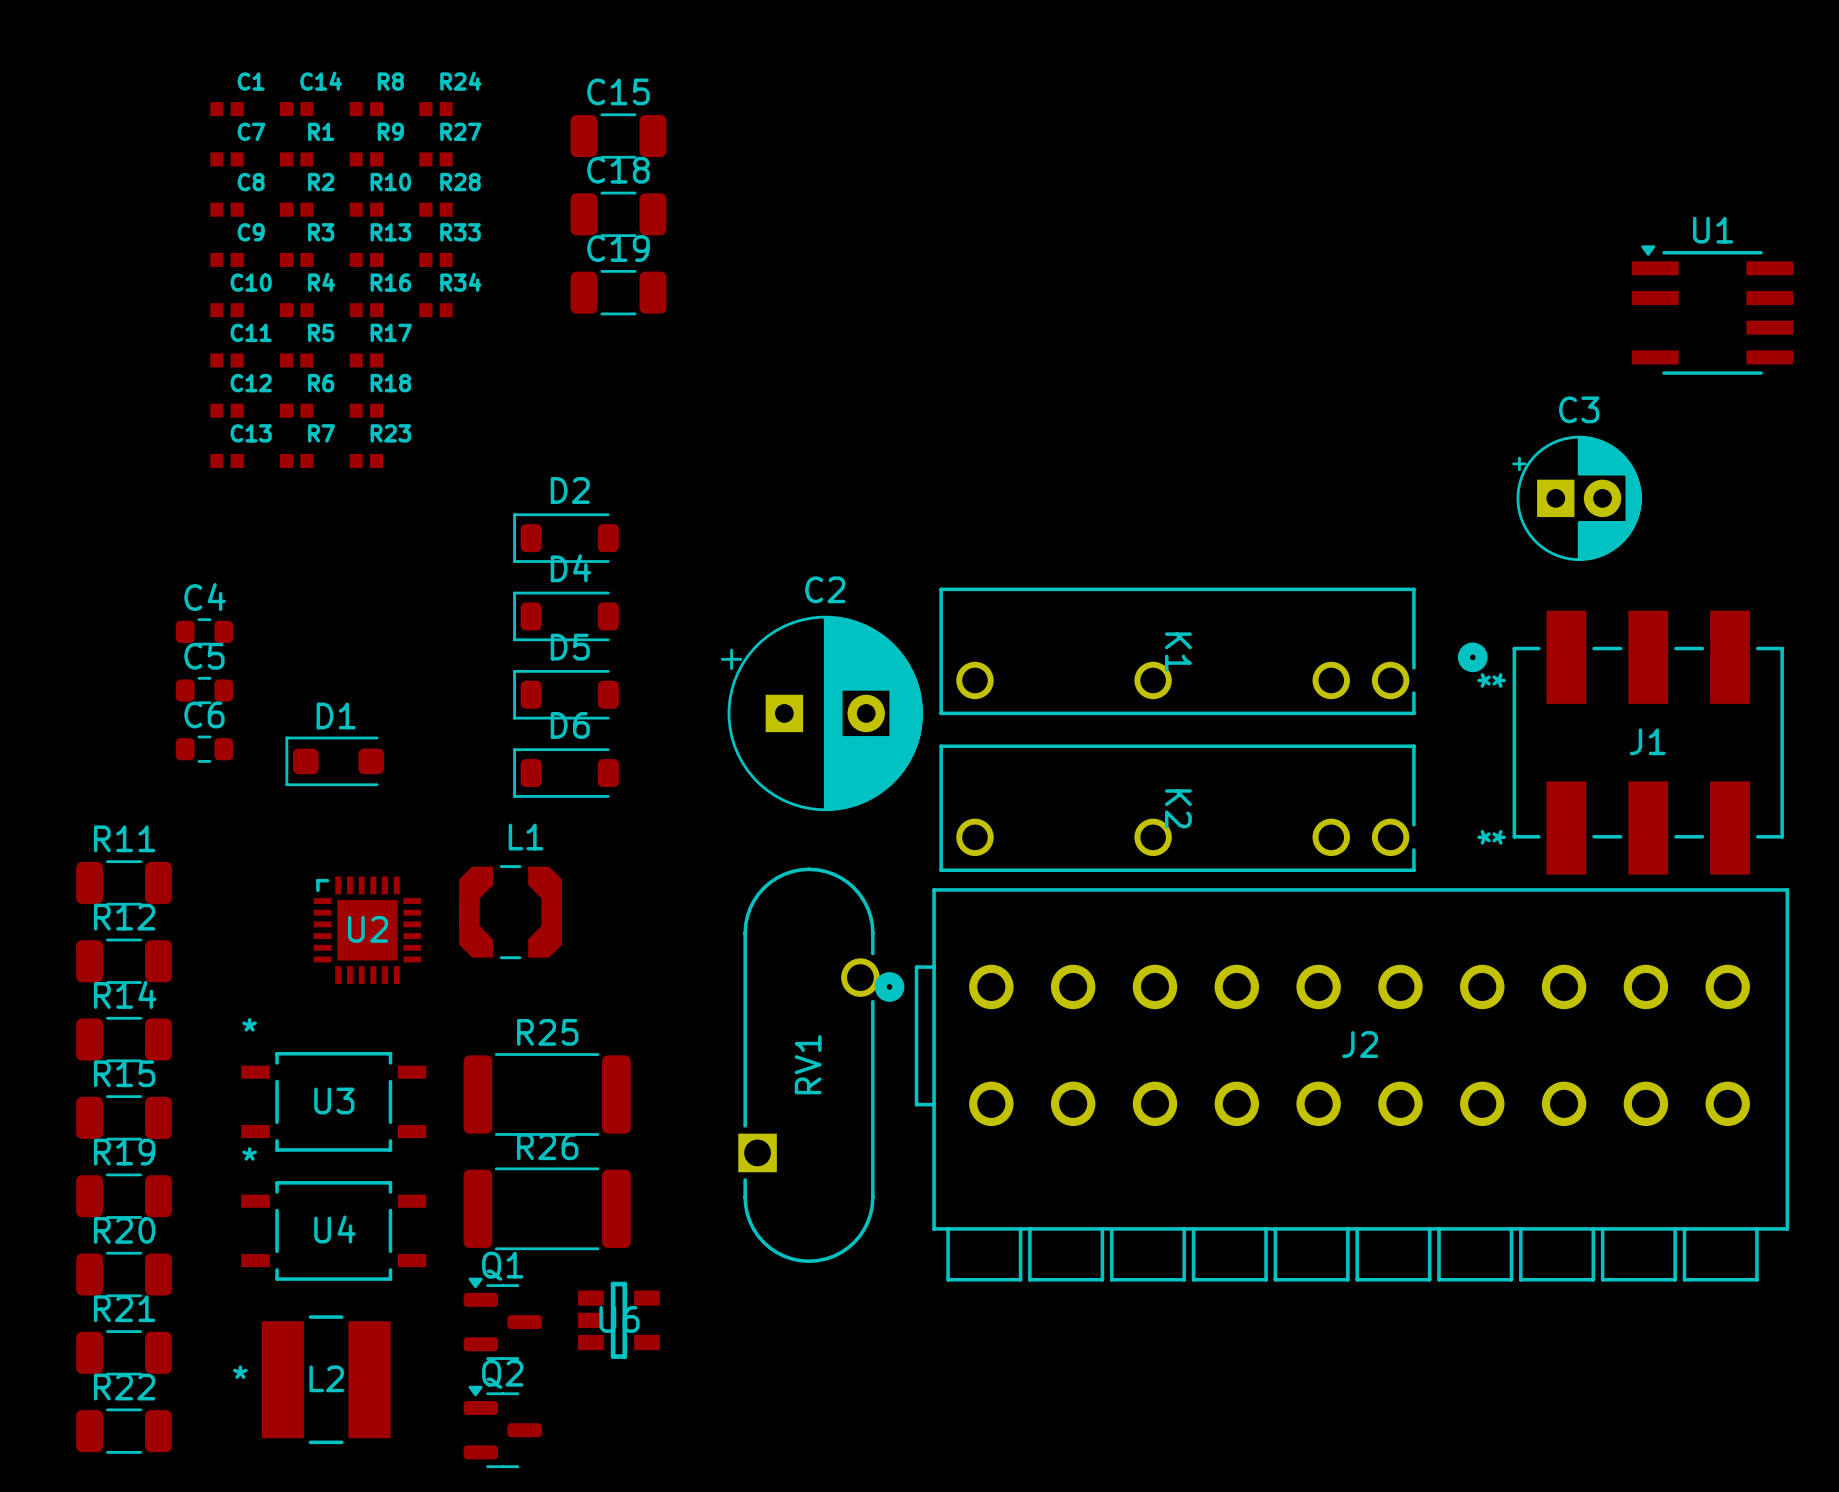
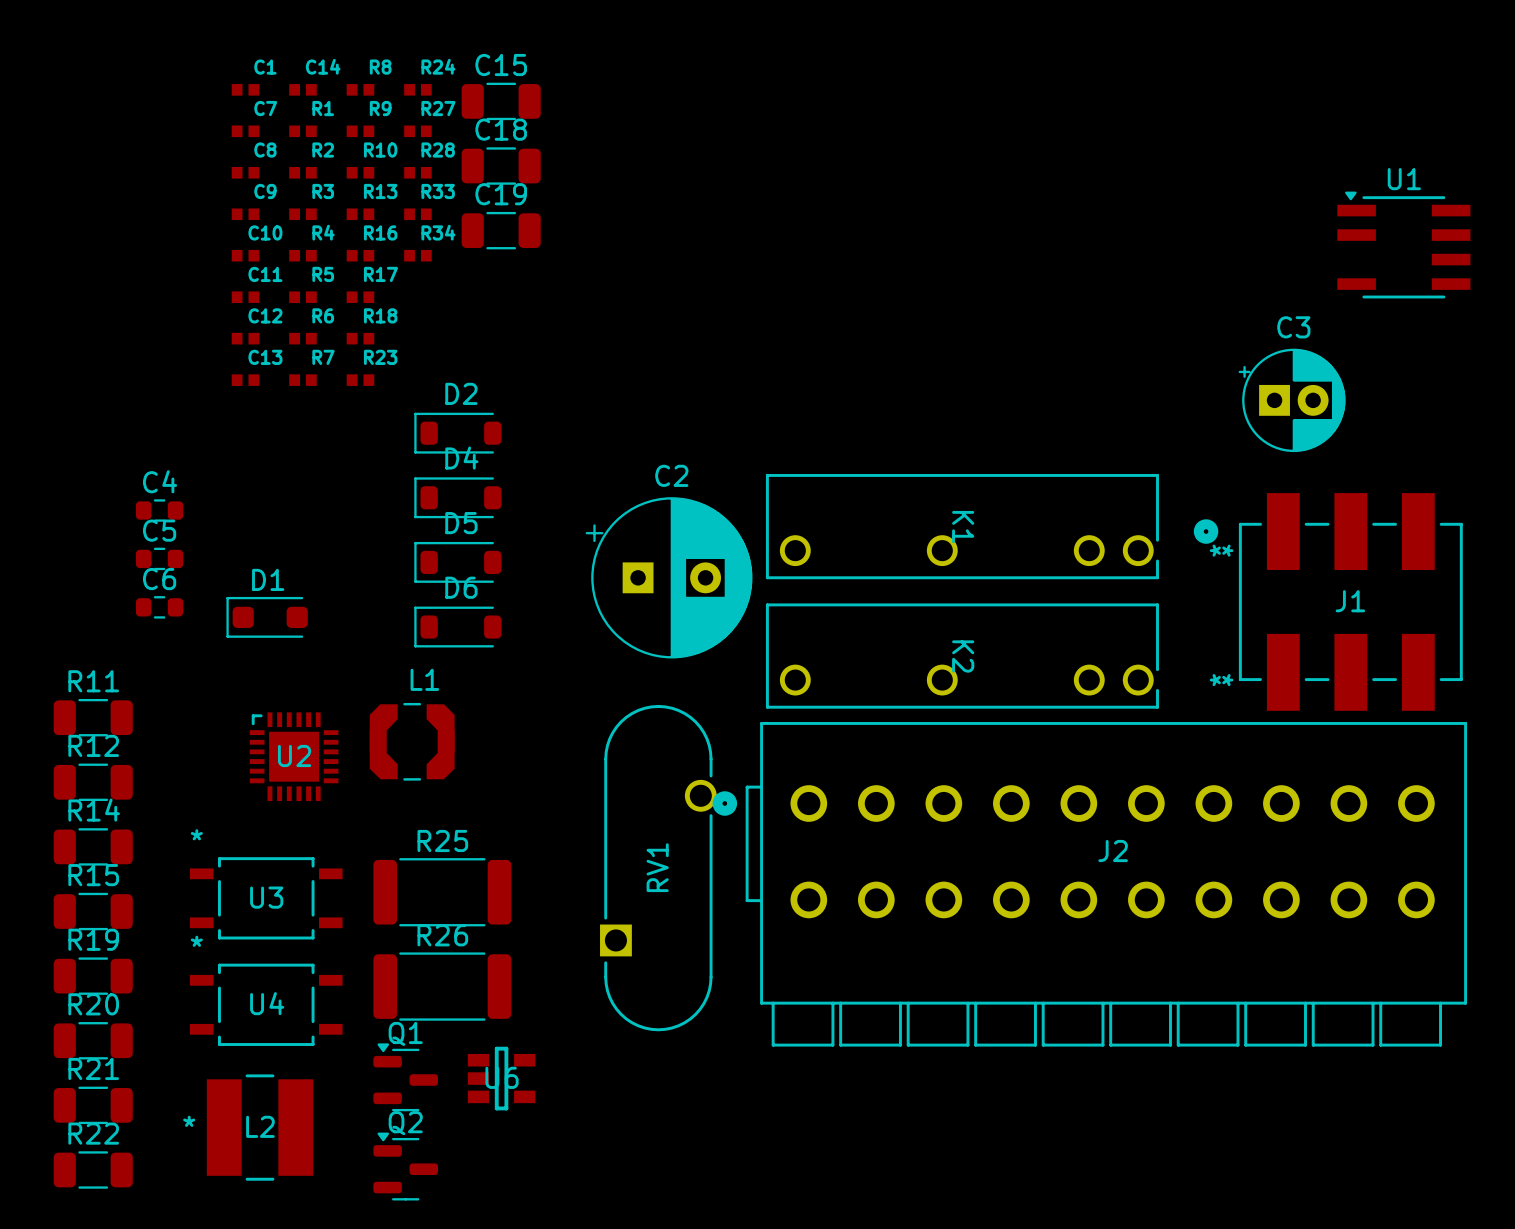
C1 position: (227, 109) -> (245, 89)
C14 position: (296, 109) -> (302, 89)
R8 position: (366, 109) -> (360, 89)
R24 position: (436, 109) -> (417, 89)
C7 position: (227, 159) -> (245, 131)
R1 position: (296, 159) -> (302, 131)
R9 position: (366, 159) -> (360, 131)
R27 position: (436, 159) -> (417, 131)
C8 position: (227, 209) -> (245, 172)
R2 position: (296, 209) -> (302, 172)
R10 position: (366, 209) -> (360, 172)
R28 position: (436, 209) -> (417, 172)
C9 position: (227, 259) -> (245, 214)
R3 position: (296, 259) -> (302, 214)
R13 position: (366, 259) -> (360, 214)
R33 position: (436, 259) -> (417, 214)
C10 position: (227, 310) -> (245, 255)
R4 position: (296, 310) -> (302, 255)
R16 position: (366, 310) -> (360, 255)
R34 position: (436, 310) -> (417, 255)
C11 position: (227, 360) -> (245, 297)
R5 position: (296, 360) -> (302, 297)
R17 position: (366, 360) -> (360, 297)
C12 position: (227, 410) -> (245, 338)
R6 position: (296, 410) -> (302, 338)
R18 position: (366, 410) -> (360, 338)
C13 position: (227, 460) -> (245, 380)
R7 position: (296, 460) -> (302, 380)
R23 position: (366, 460) -> (360, 380)

